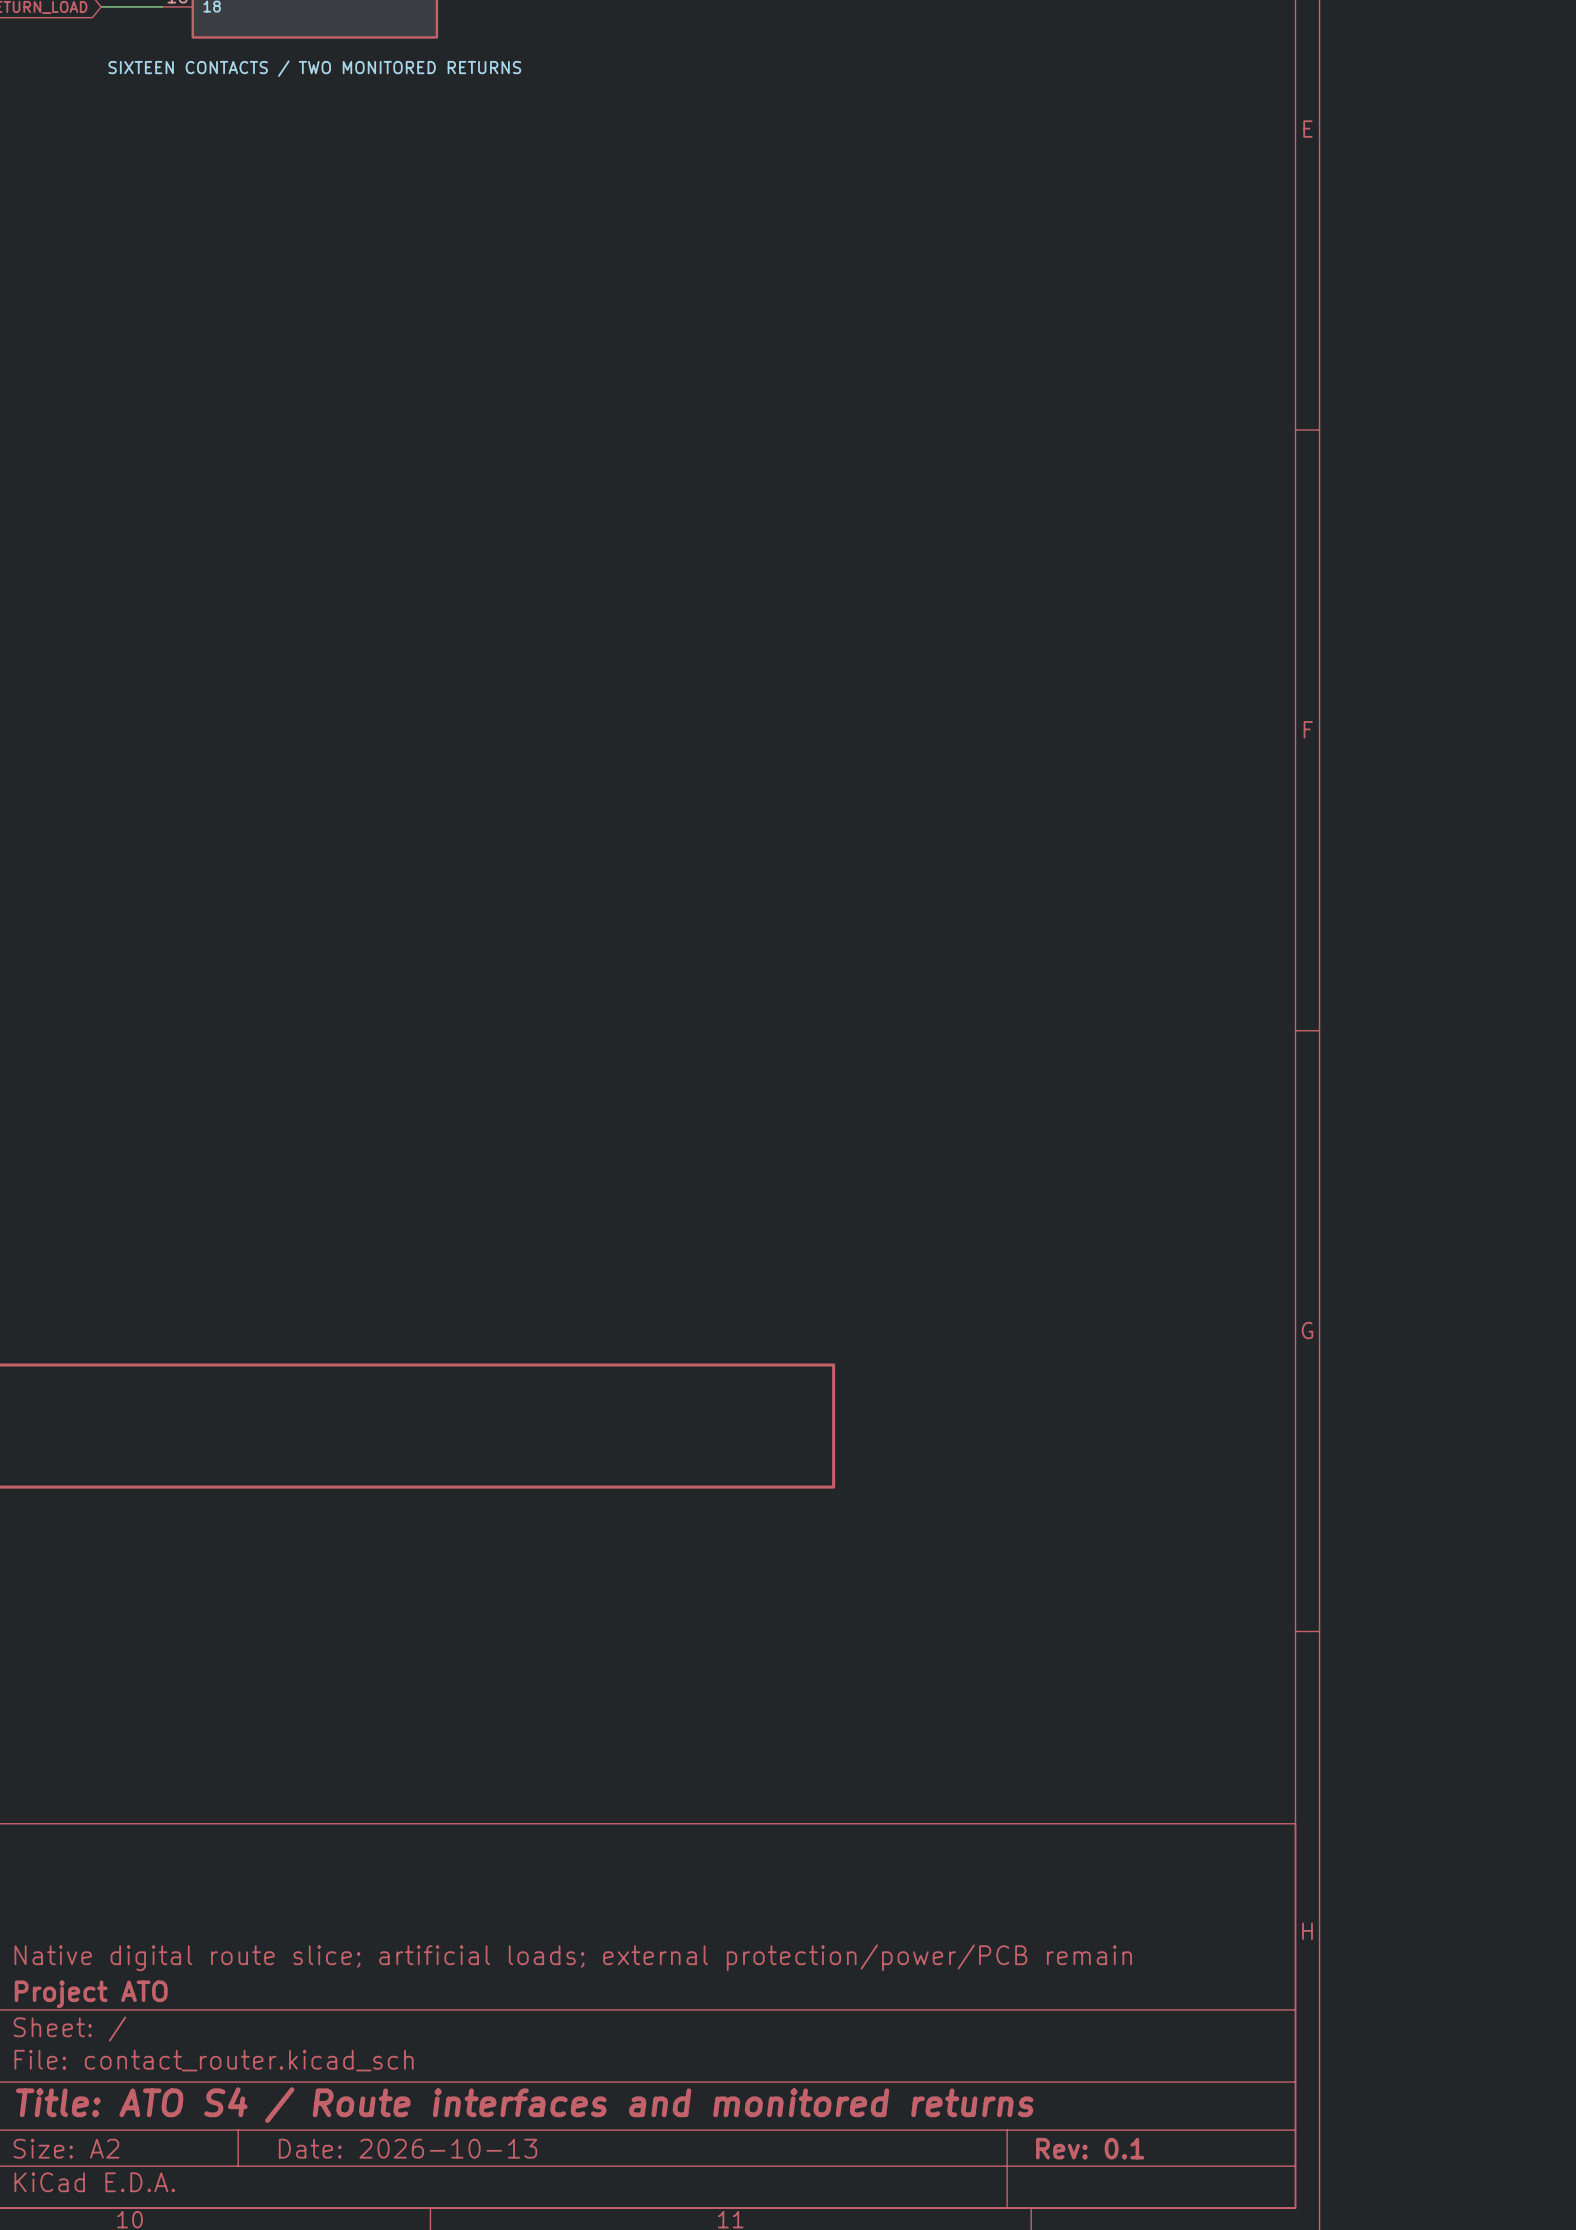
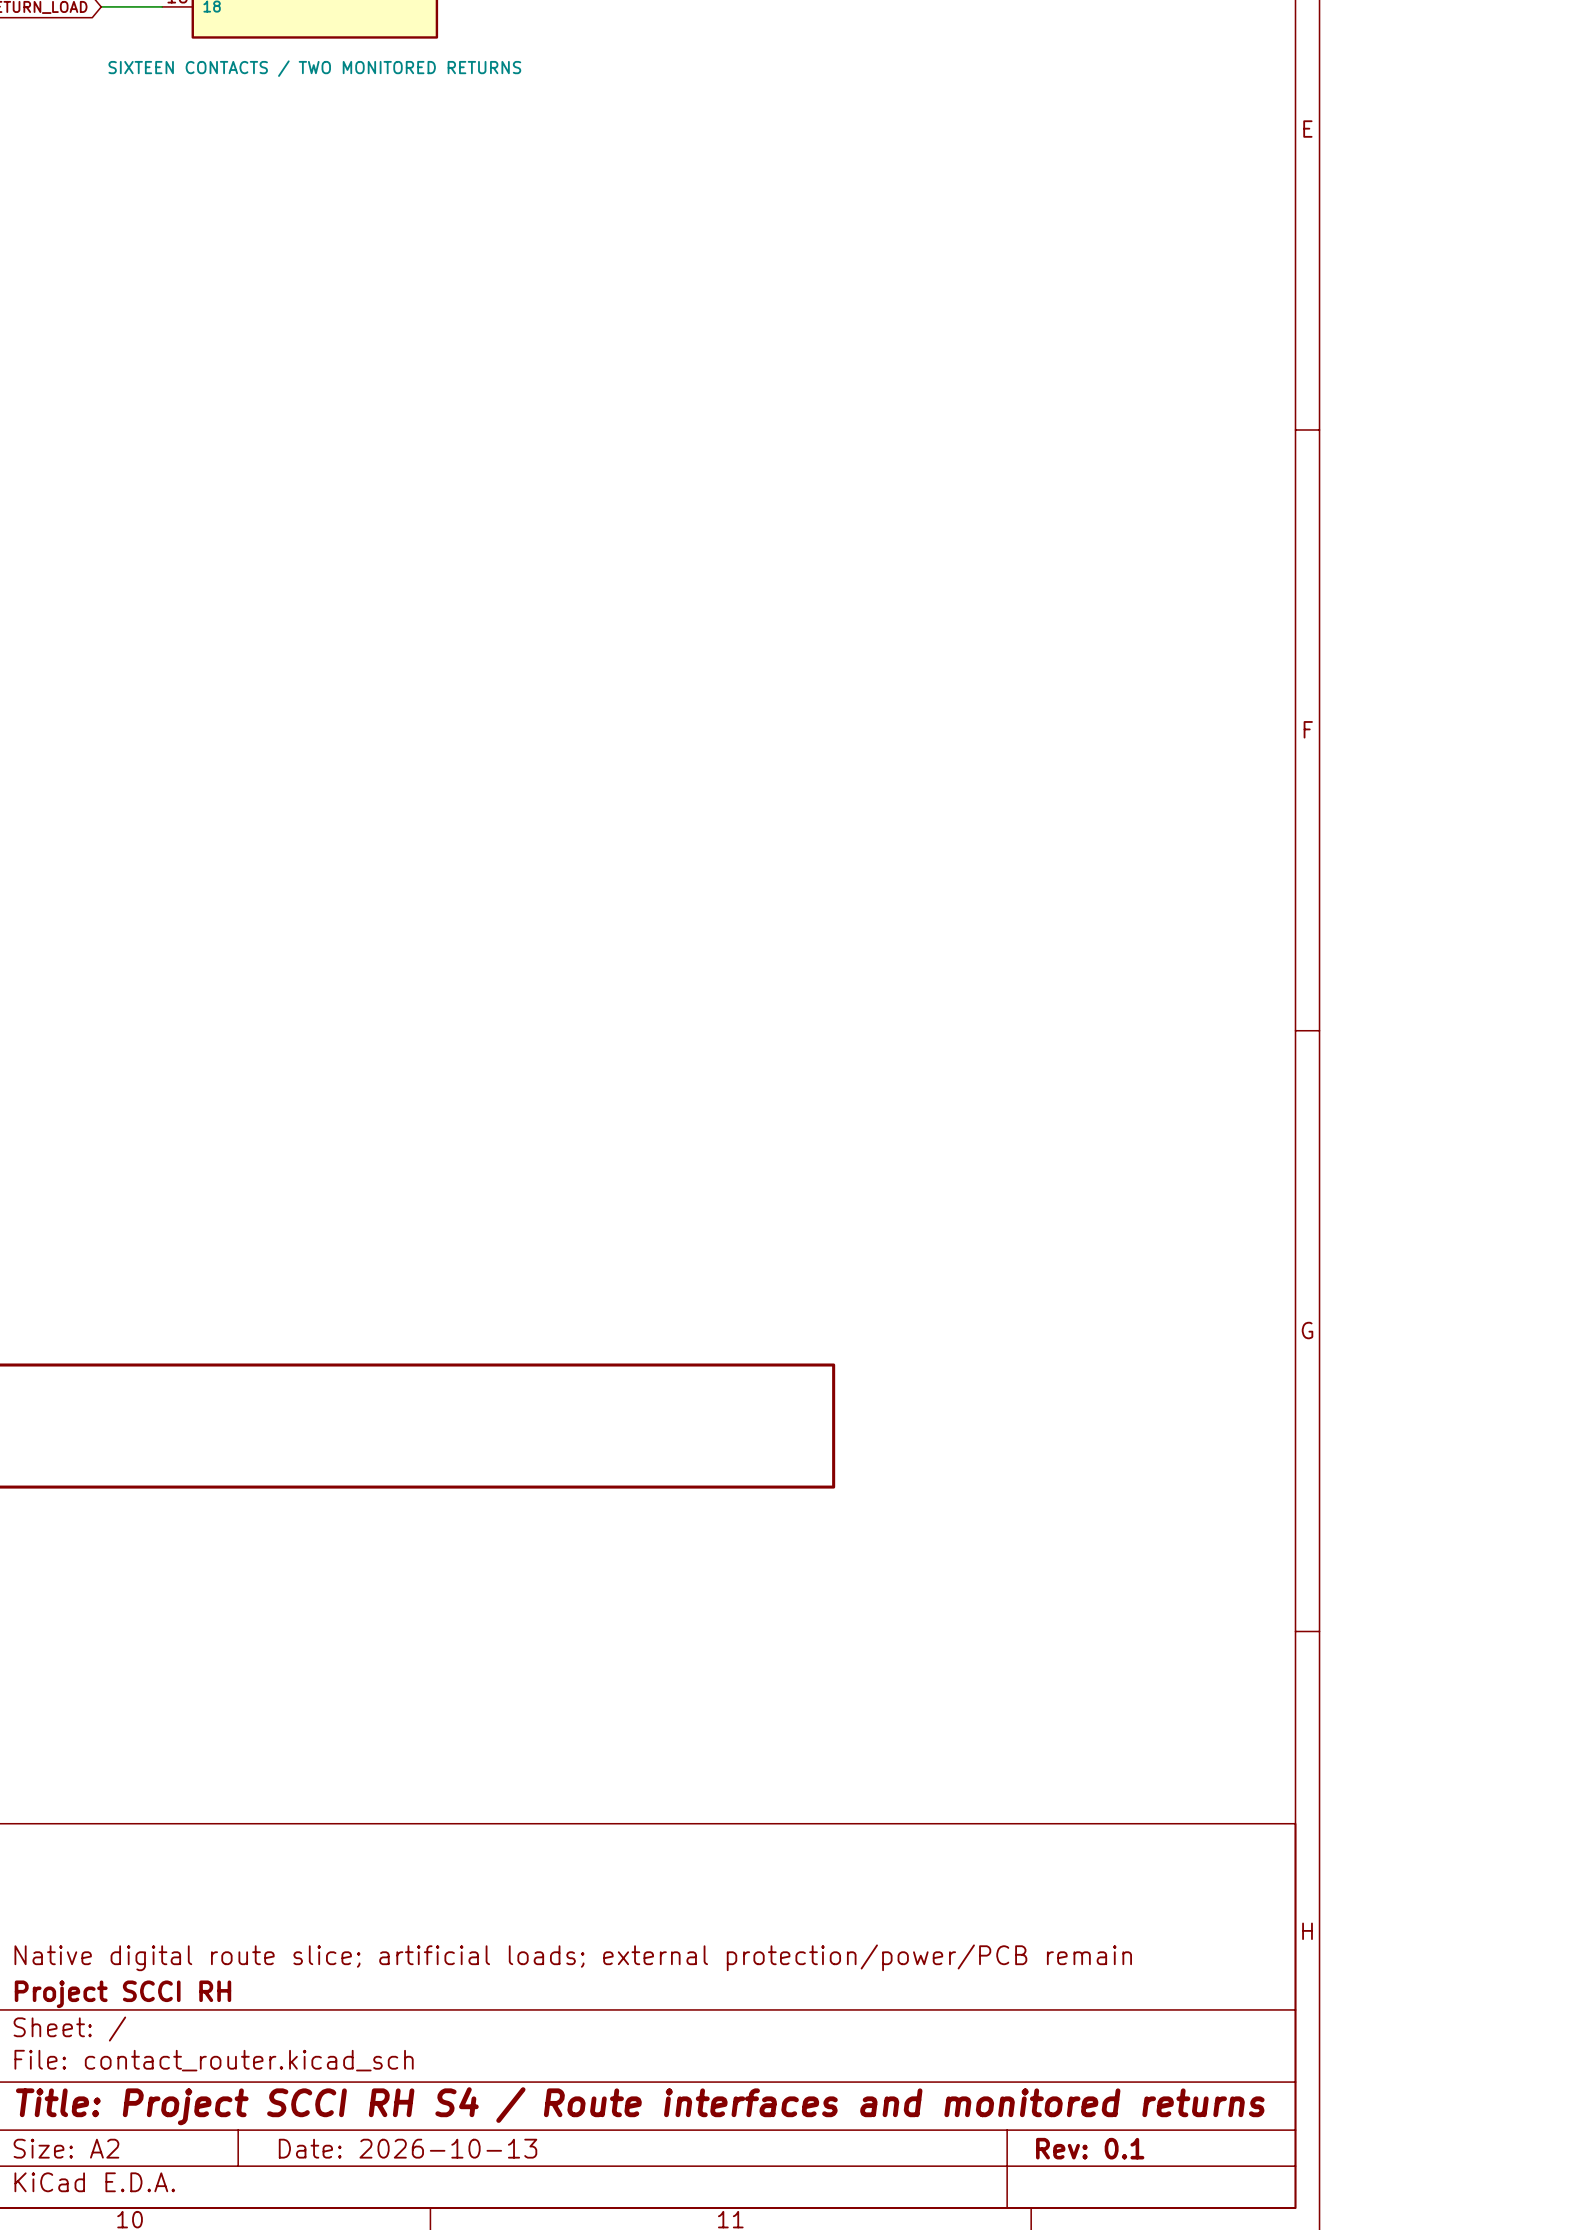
title block: Project ATO (91, 1994) -> Project SCCI RH (122, 1994)
title block: Title: ATO S4 / Route interfaces and monitored returns (524, 2105) -> Title: Project SCCI RH S4 / Route interfaces and monitored returns (640, 2106)

